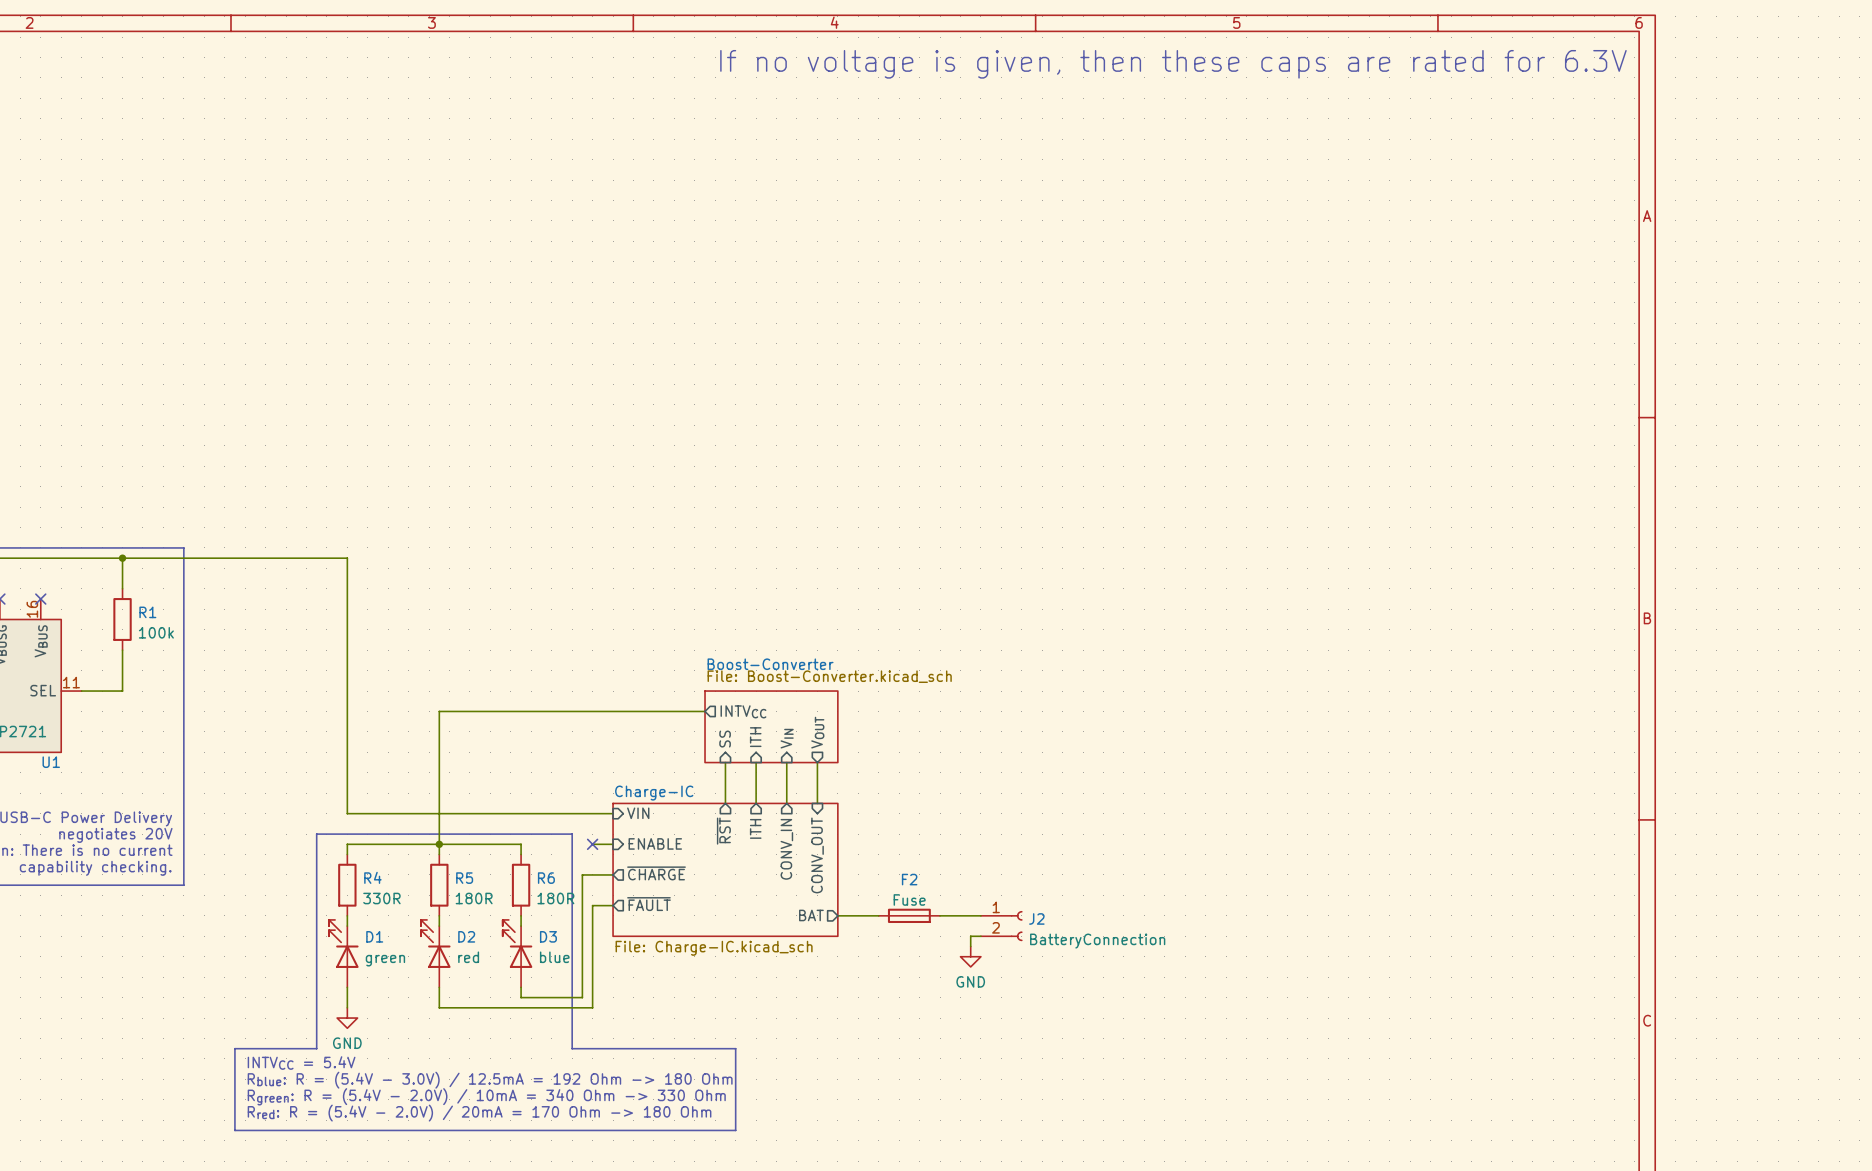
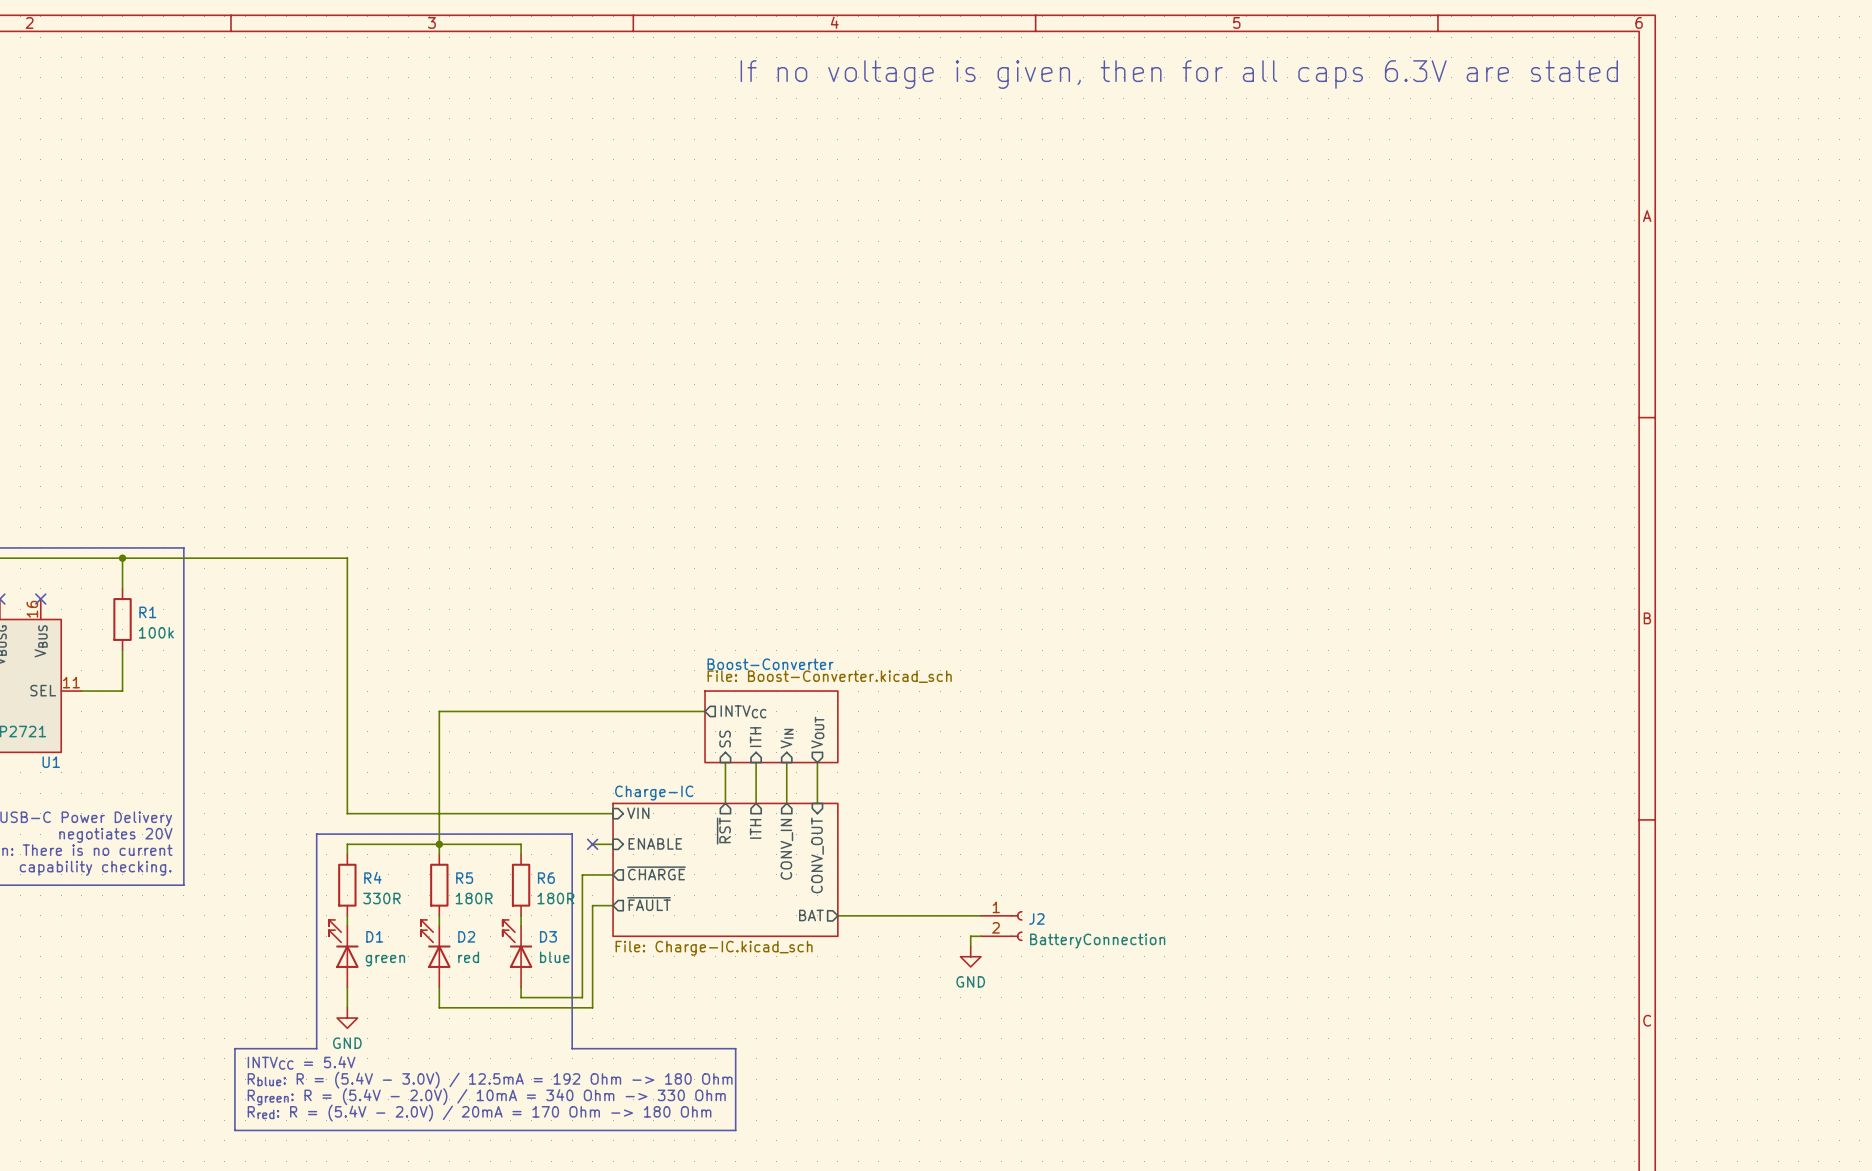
text: If no voltage is given, then these caps are rated for 6.3V (1173, 64) -> If no voltage is given, then for all caps 6.3V are stated (1179, 74)
F2: Fuse (909, 915) -> none

